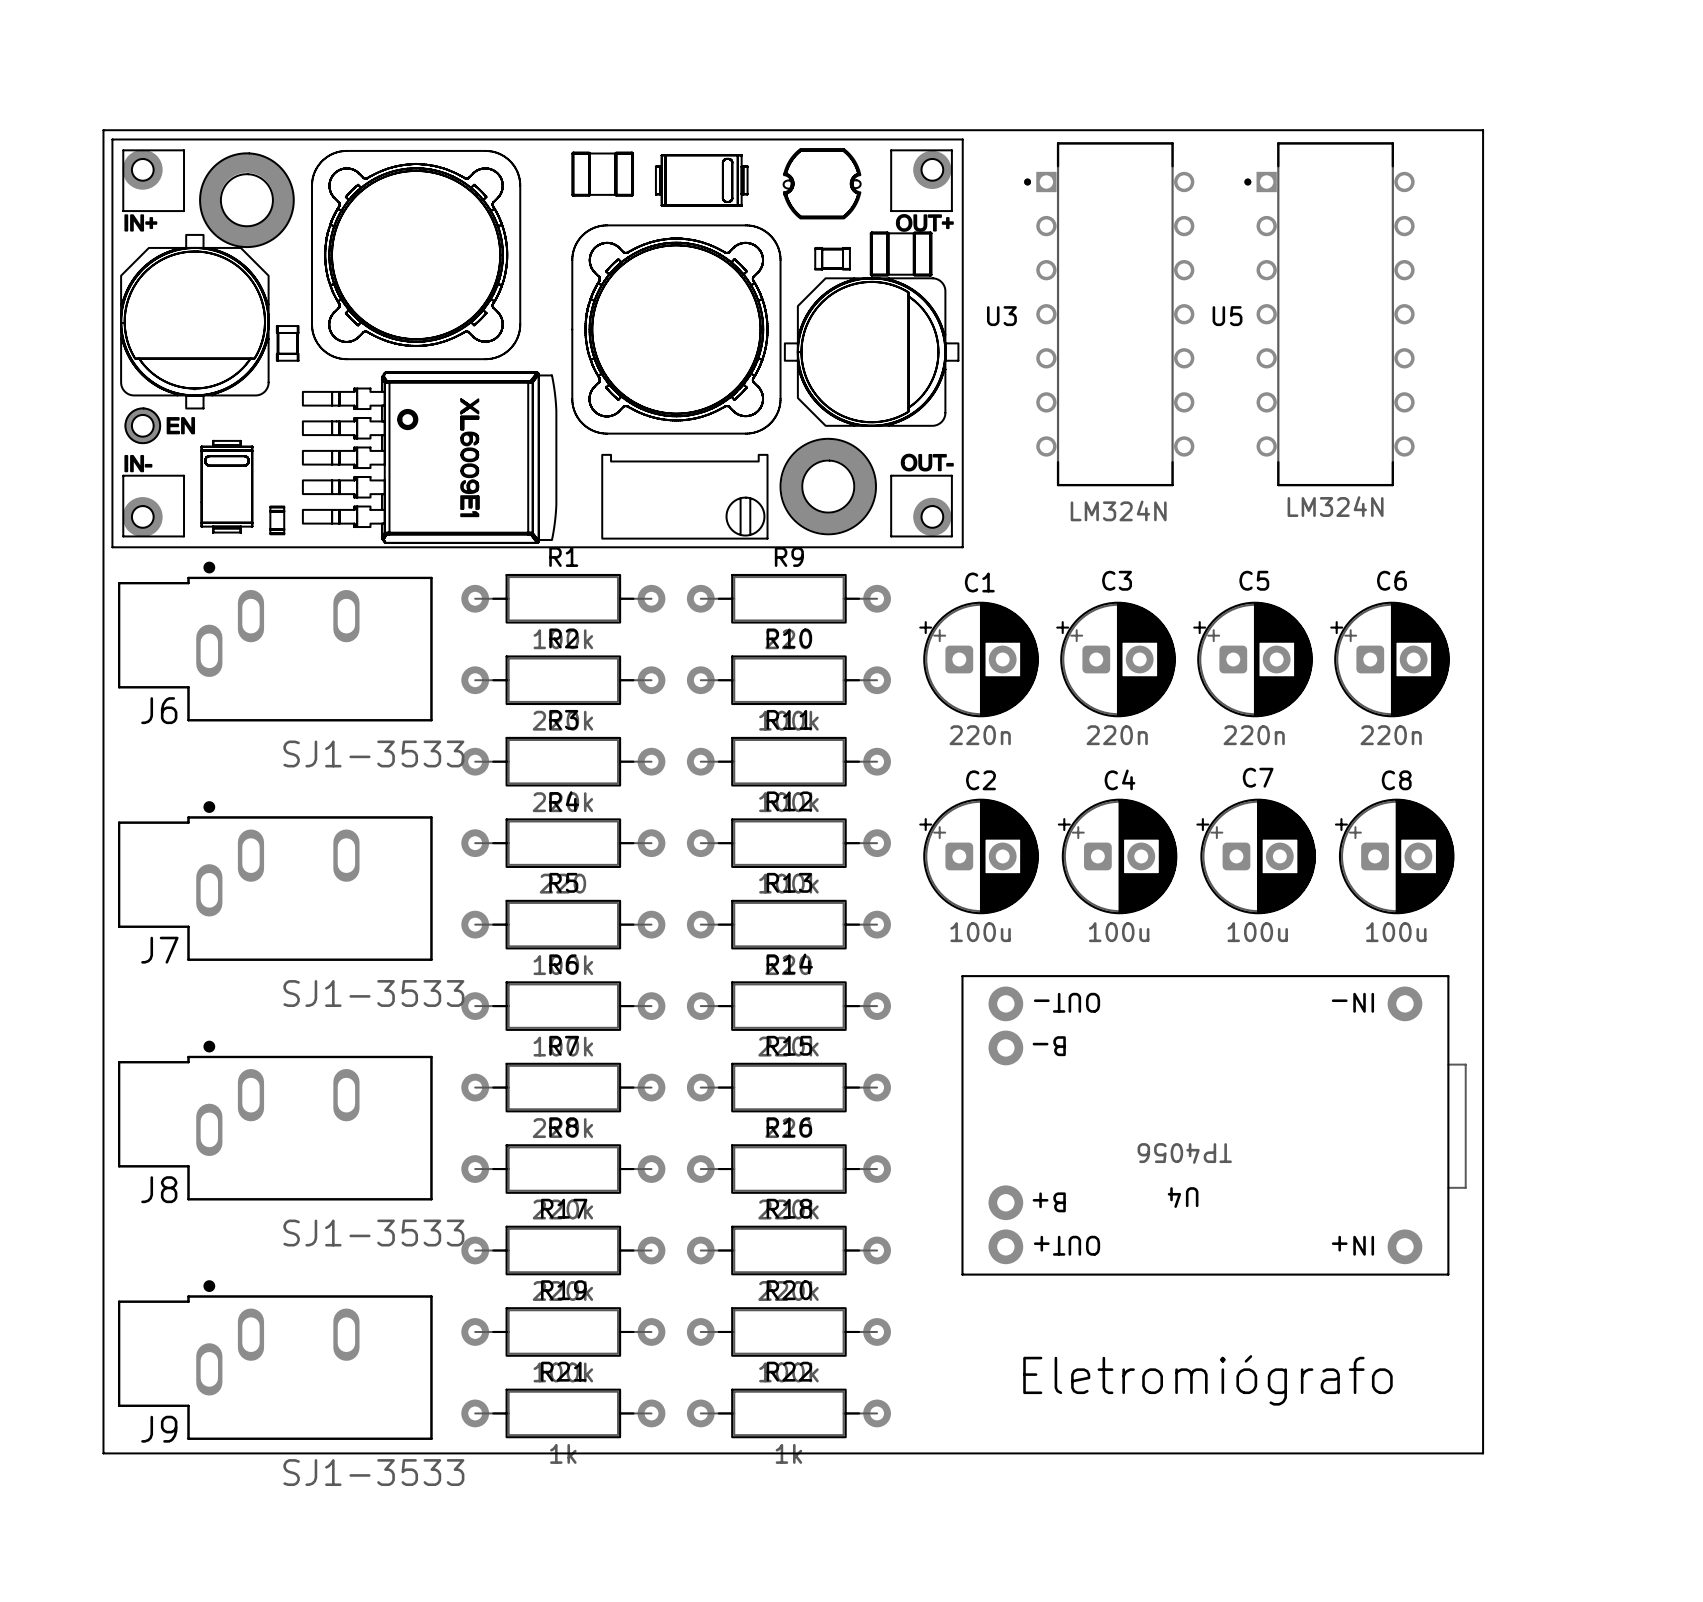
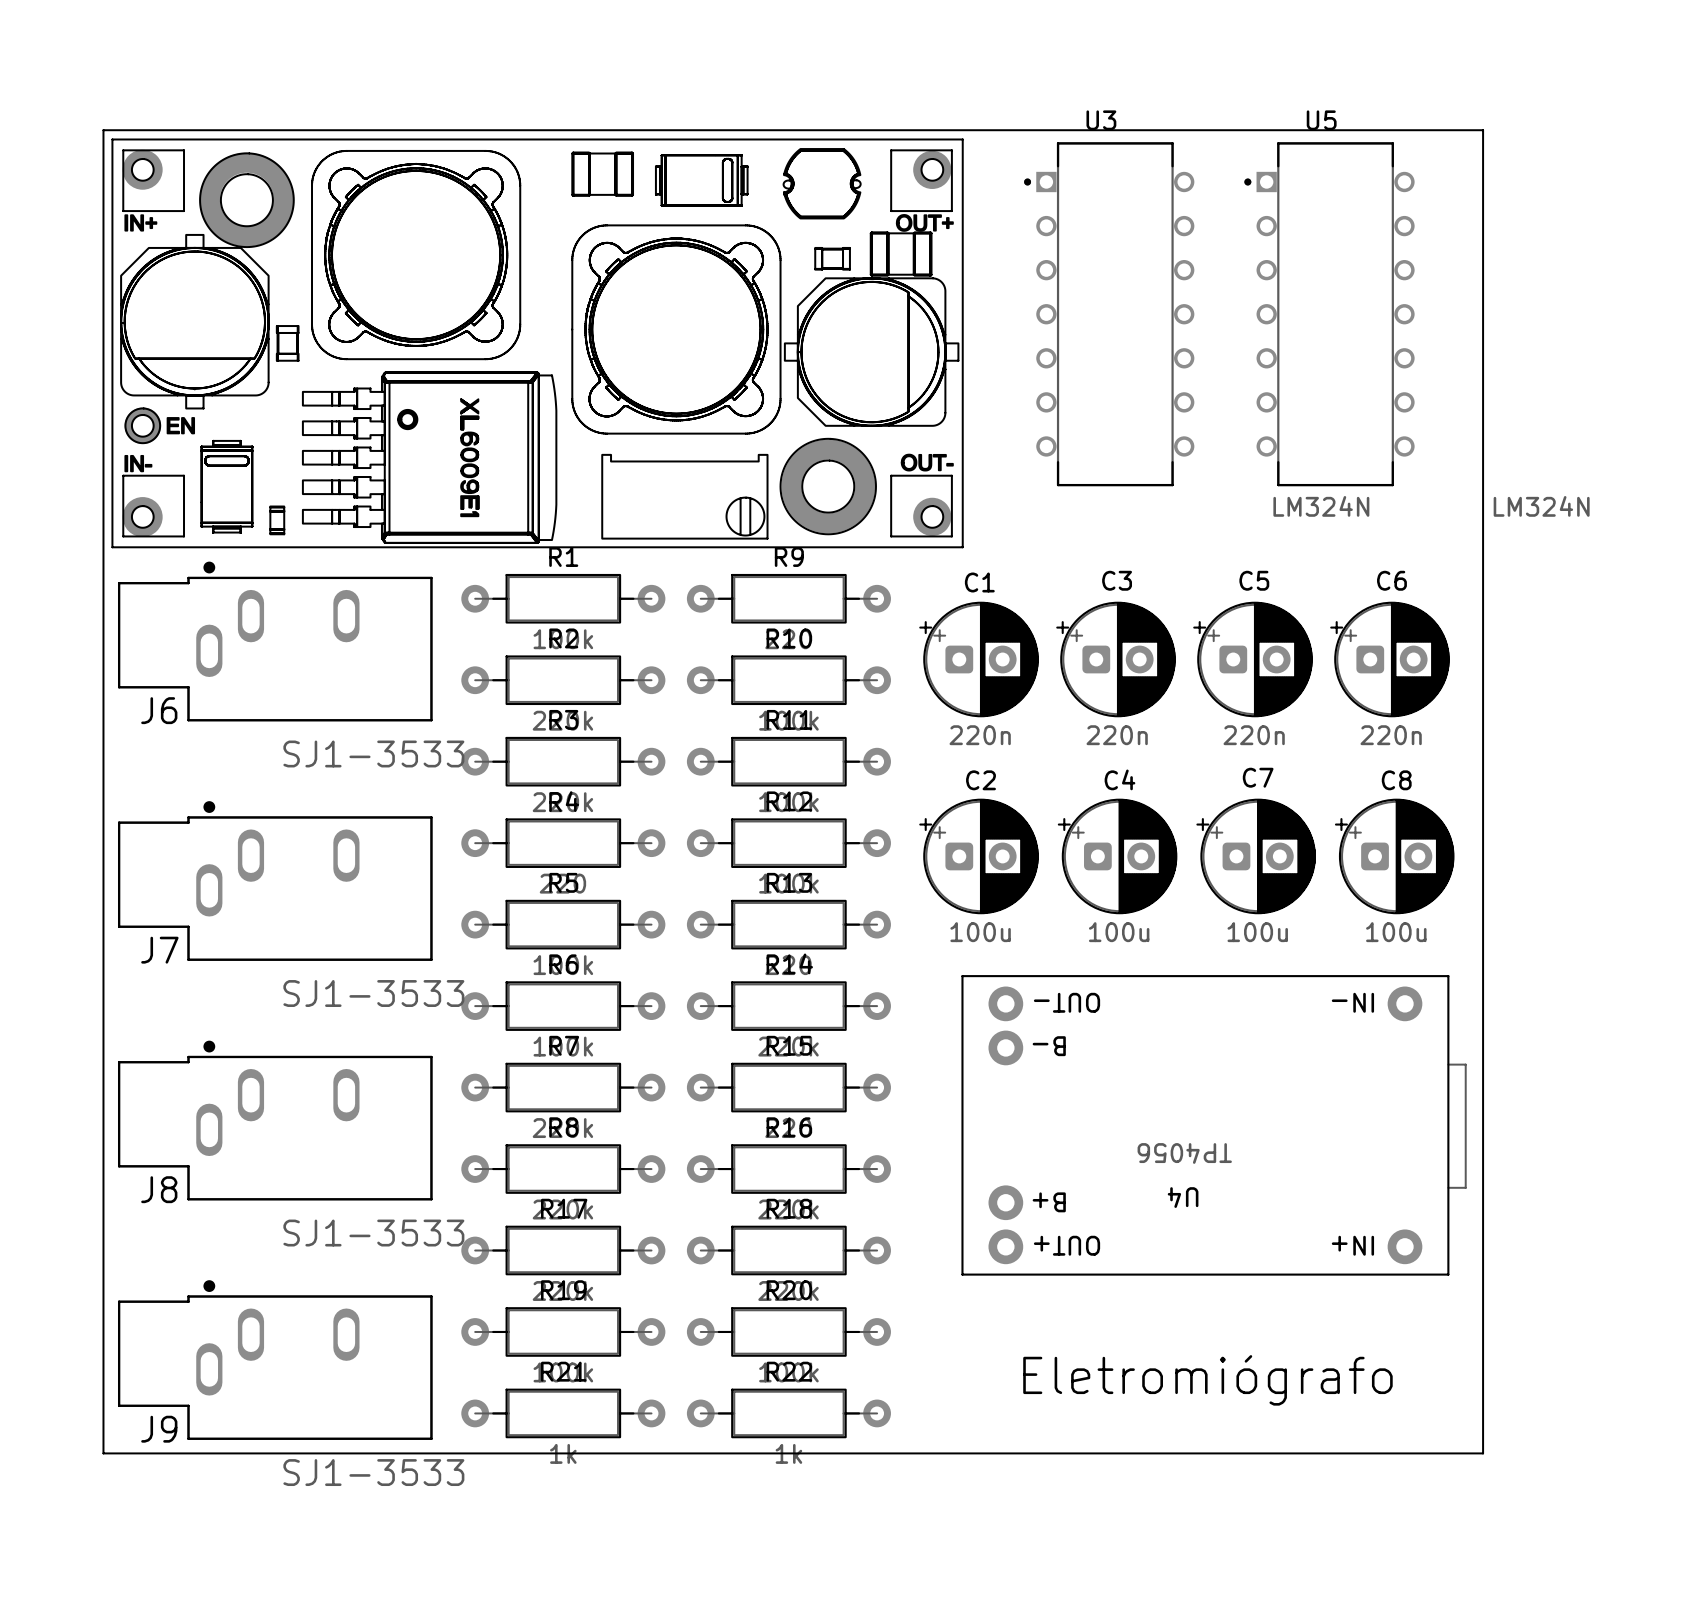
U3 name position: U3 (1001, 316) -> U3 (1101, 120)
U5 name position: U5 (1227, 316) -> U5 (1321, 120)
U5 value position: LM324N (1335, 506) -> LM324N (1541, 506)
U3 value position: LM324N (1118, 510) -> LM324N (1321, 506)

